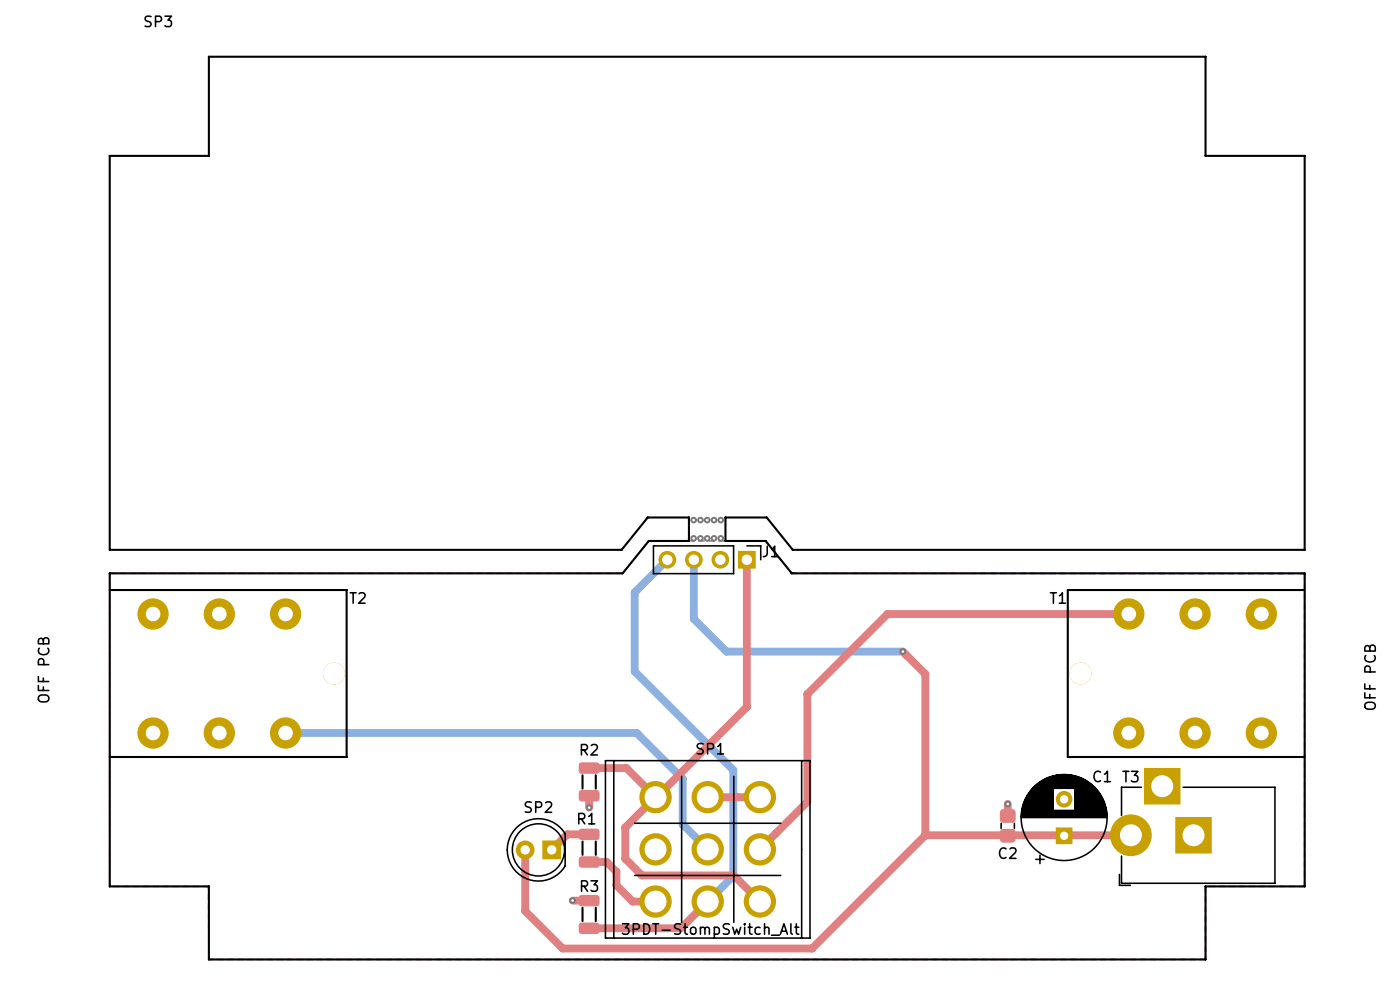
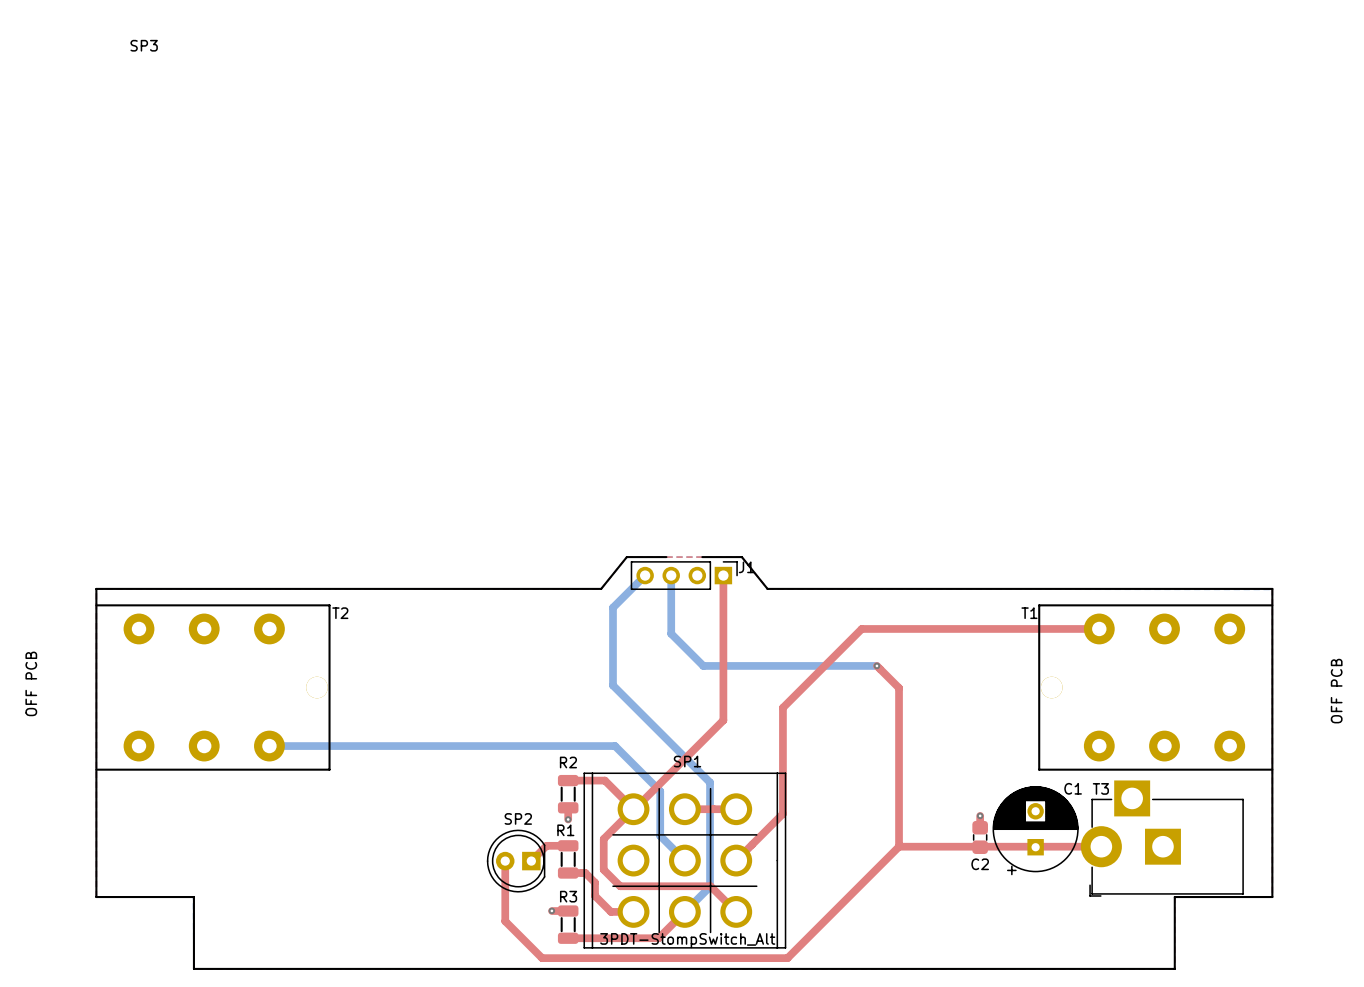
via: (693, 520) -> none
via: (700, 520) -> none
via: (707, 520) -> none
via: (713, 520) -> none
via: (720, 520) -> none
via: (693, 538) -> none
via: (700, 538) -> none
via: (707, 538) -> none
via: (713, 538) -> none
via: (720, 538) -> none
board edge: (688, 540) (688, 517) (647, 517) (621, 549) (109, 549) (109, 155) (208, 155) (208, 56) (1205, 56) (1205, 155) (1304, 155) (1304, 549) (792, 549) (766, 517) (725, 517) (725, 540) -> none

